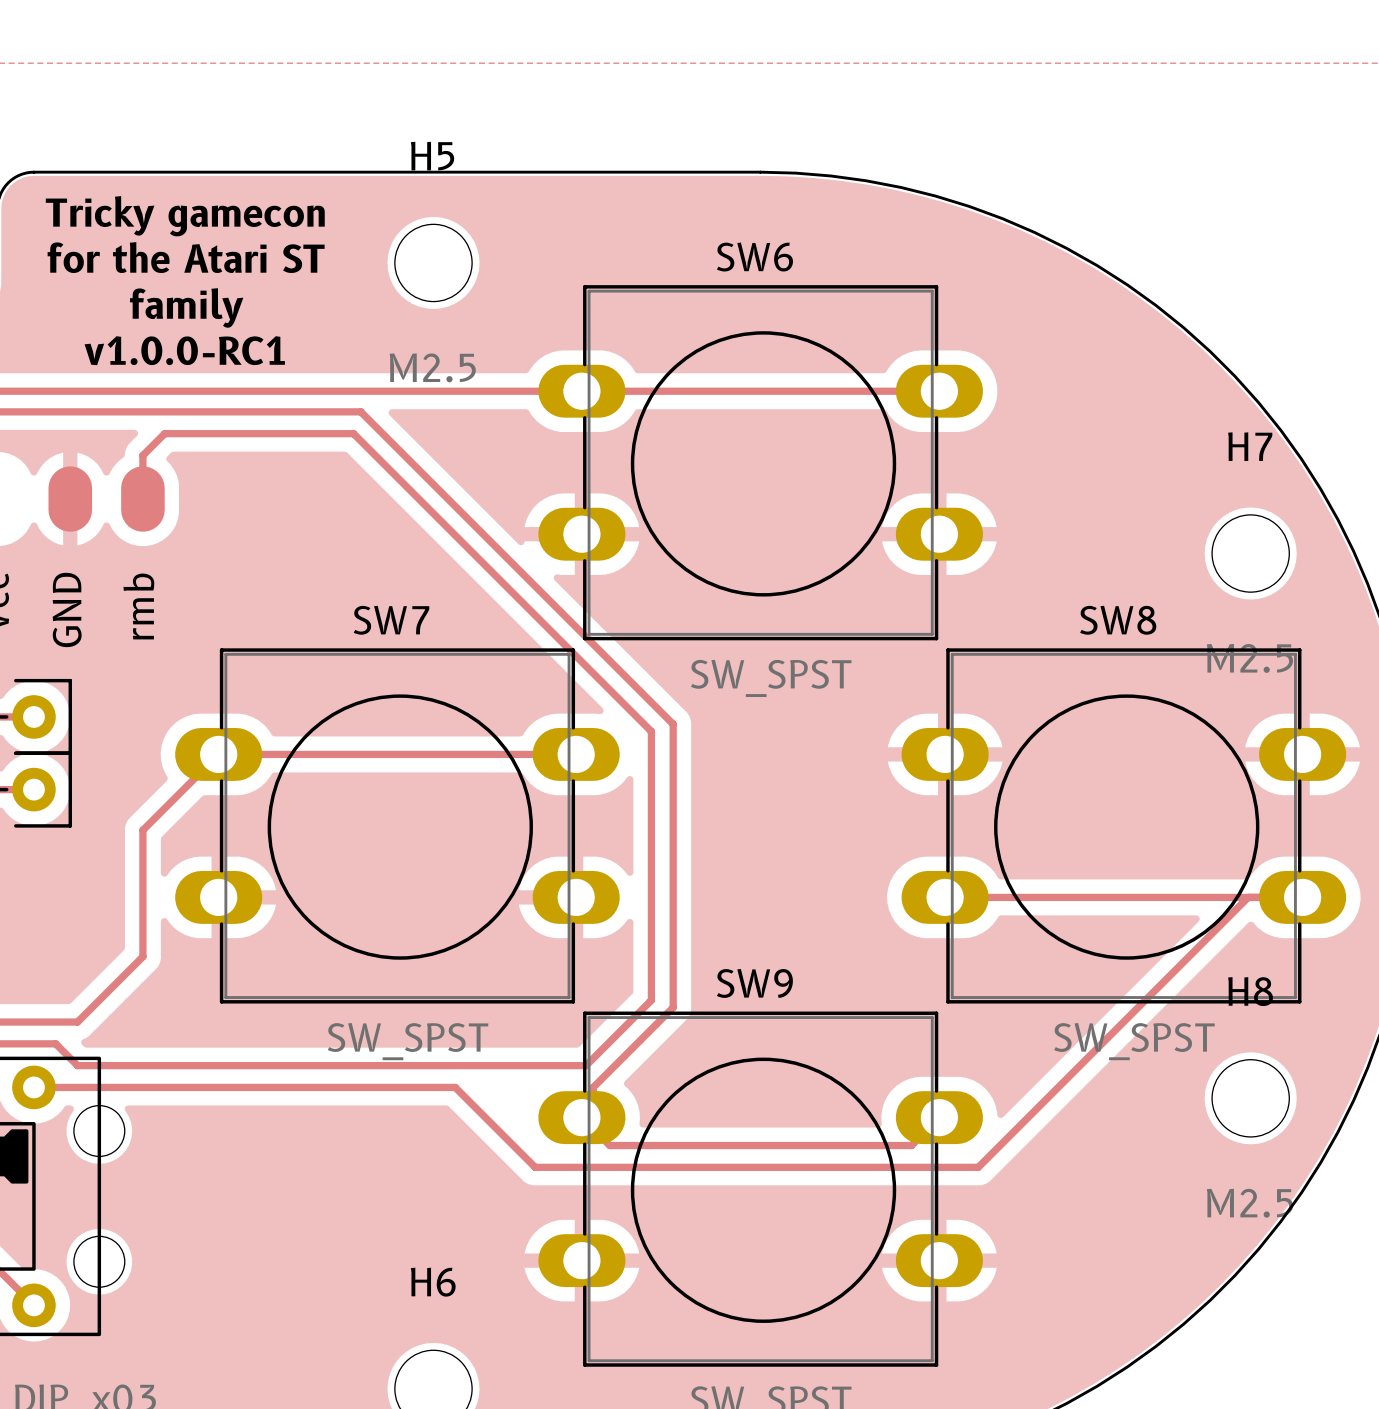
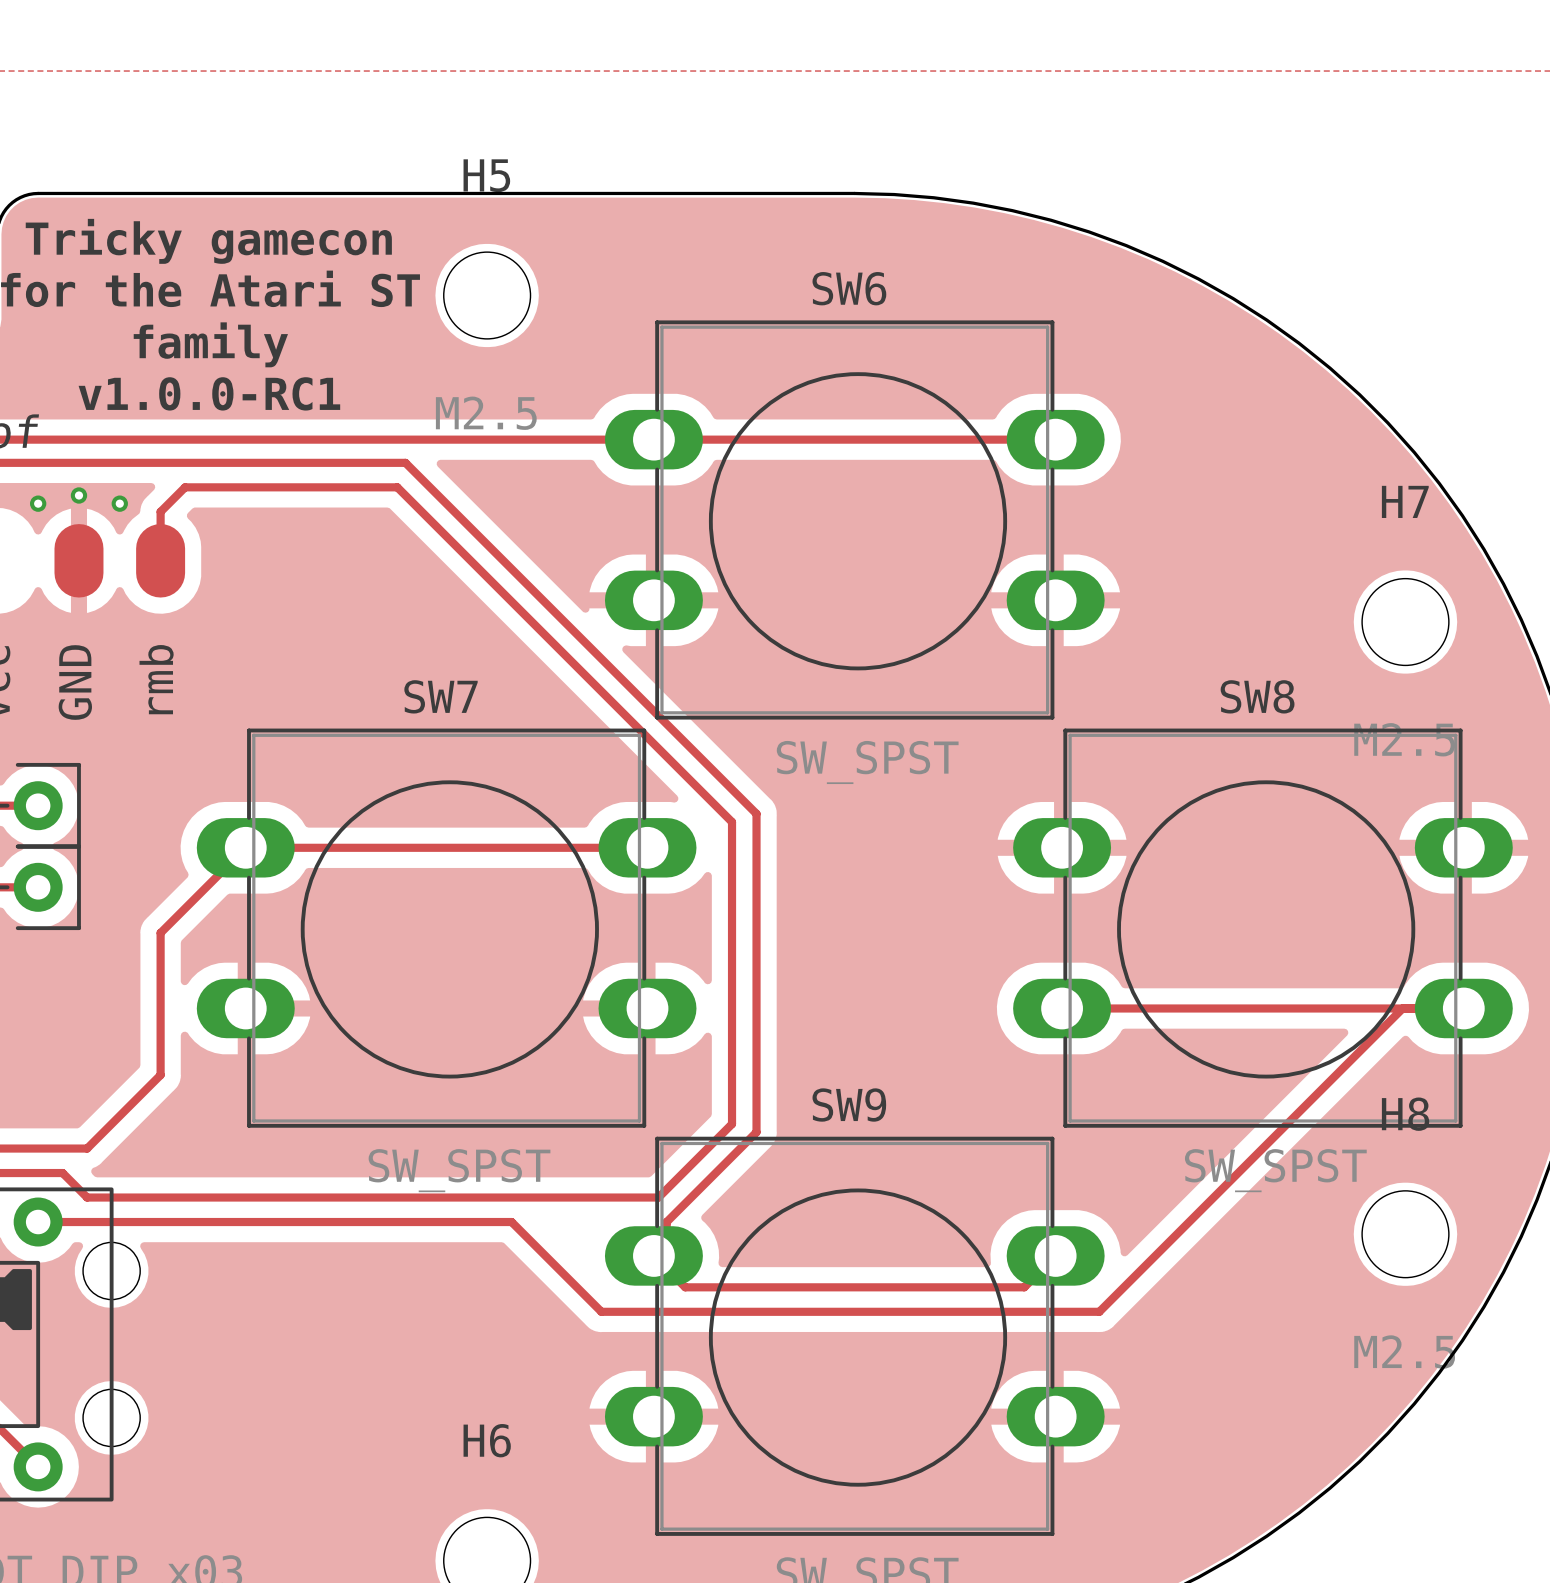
via: none -> (78, 495)
via: none -> (38, 503)
via: none -> (119, 503)

